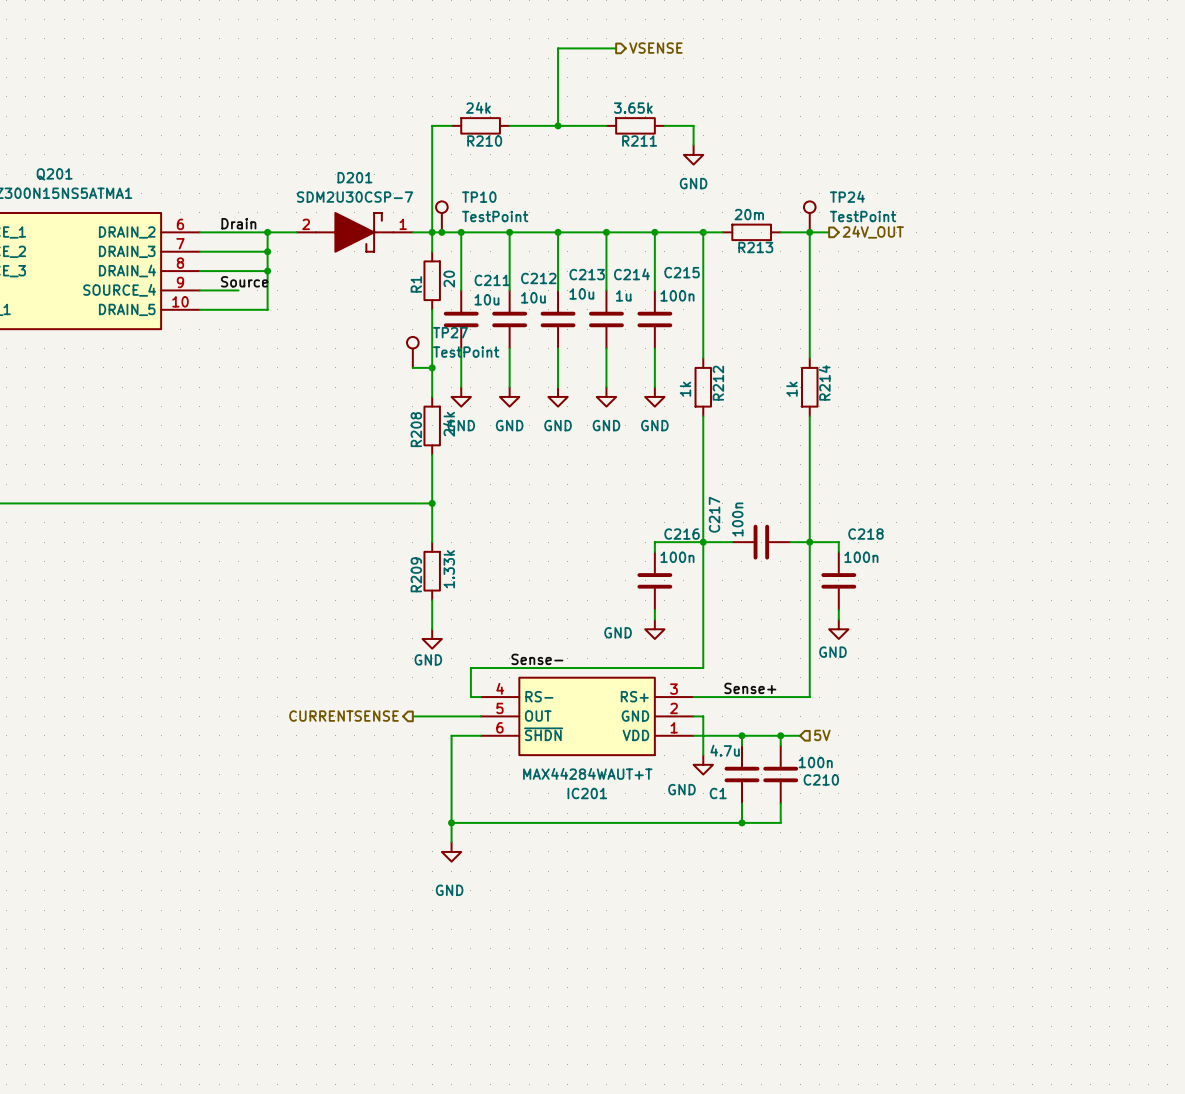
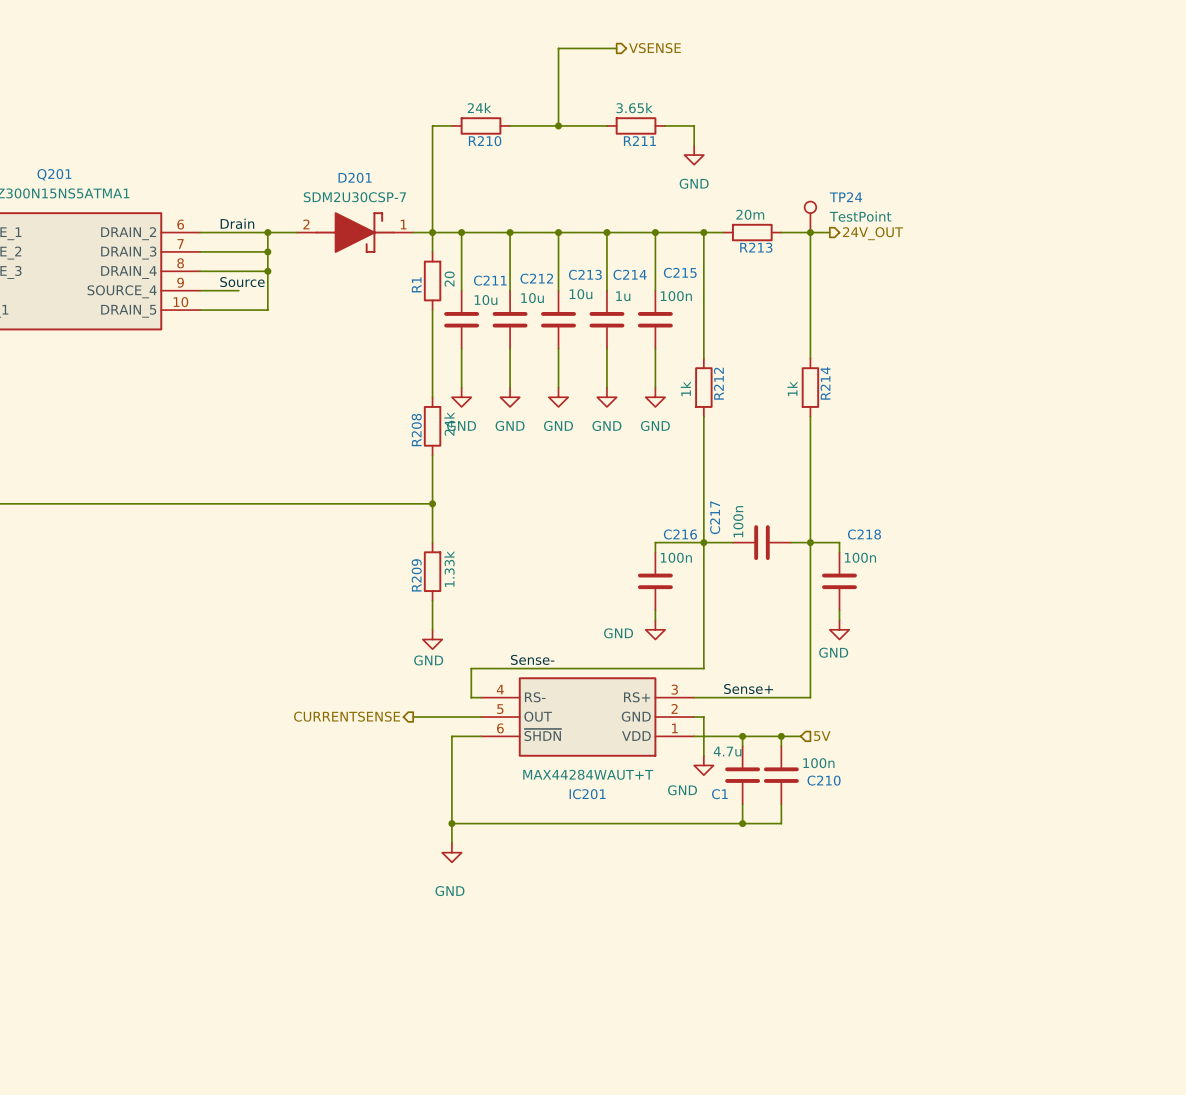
TP10: TestPoint (441, 216) -> none
junction: (441, 232) -> none
TP27: TestPoint (412, 352) -> none
wire: (412, 367) (432, 367) -> none
junction: (432, 367) -> none

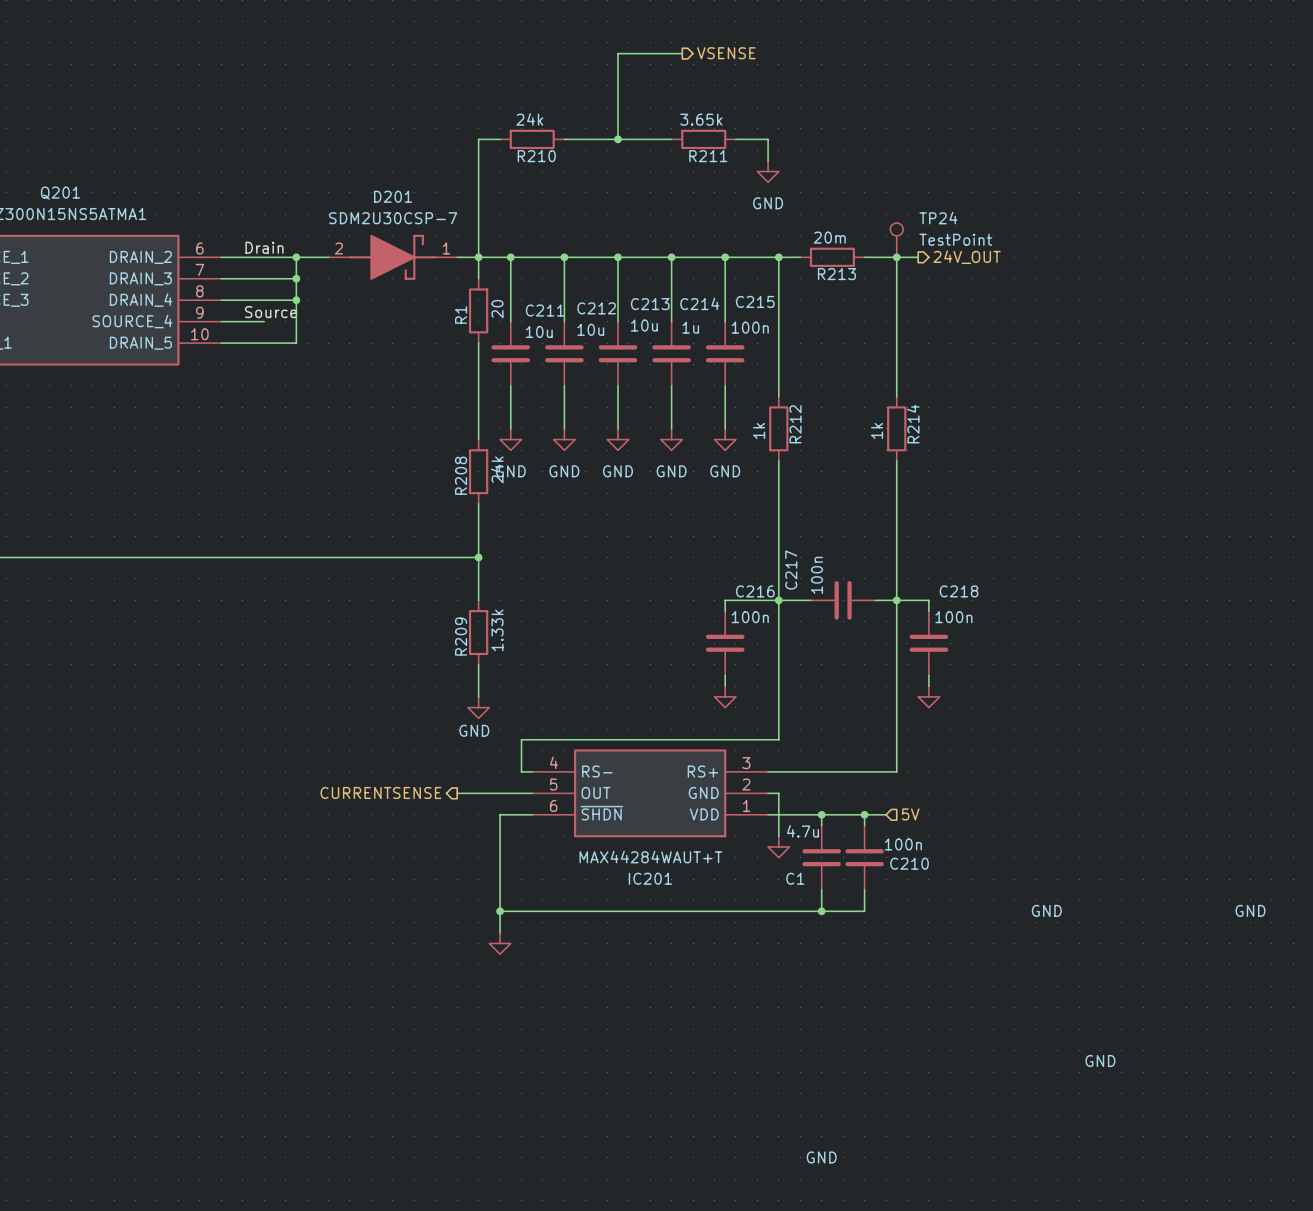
power symbol text position: GND (618, 633) -> GND (1046, 910)
power symbol text position: GND (833, 652) -> GND (1250, 910)
label: Sense- (532, 659) -> none
label: Sense+ (748, 688) -> none
power symbol text position: GND (682, 790) -> GND (1100, 1061)
power symbol text position: GND (449, 891) -> GND (821, 1157)

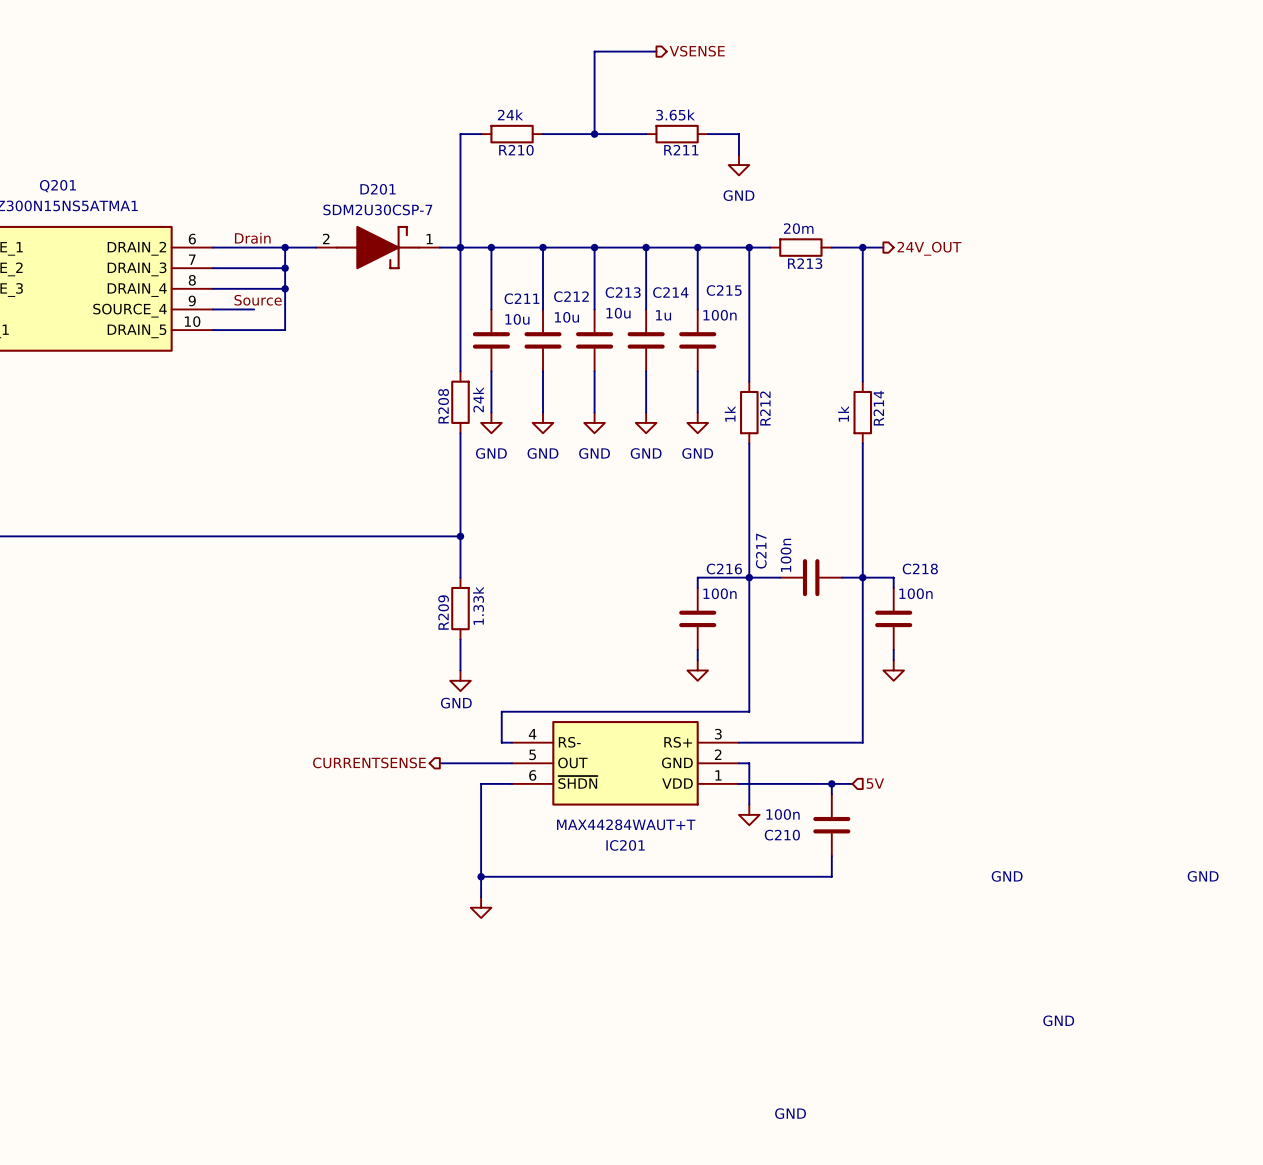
TP24: TestPoint (896, 240) -> none
wire: none -> (460, 268) (460, 330)
R1: 20 (478, 310) -> none
wire: (478, 385) (478, 439) -> (460, 433) (460, 484)
R208 position: (478, 471) -> (460, 402)
wire: (821, 814) (821, 825) -> none
junction: (821, 814) -> none
C210 value position: 100n (903, 844) -> 100n (783, 814)
C1: 4.7u (821, 857) -> none
C210 name position: C210 (909, 863) -> C210 (782, 835)
wire: (821, 889) (821, 911) -> none
junction: (821, 911) -> none

